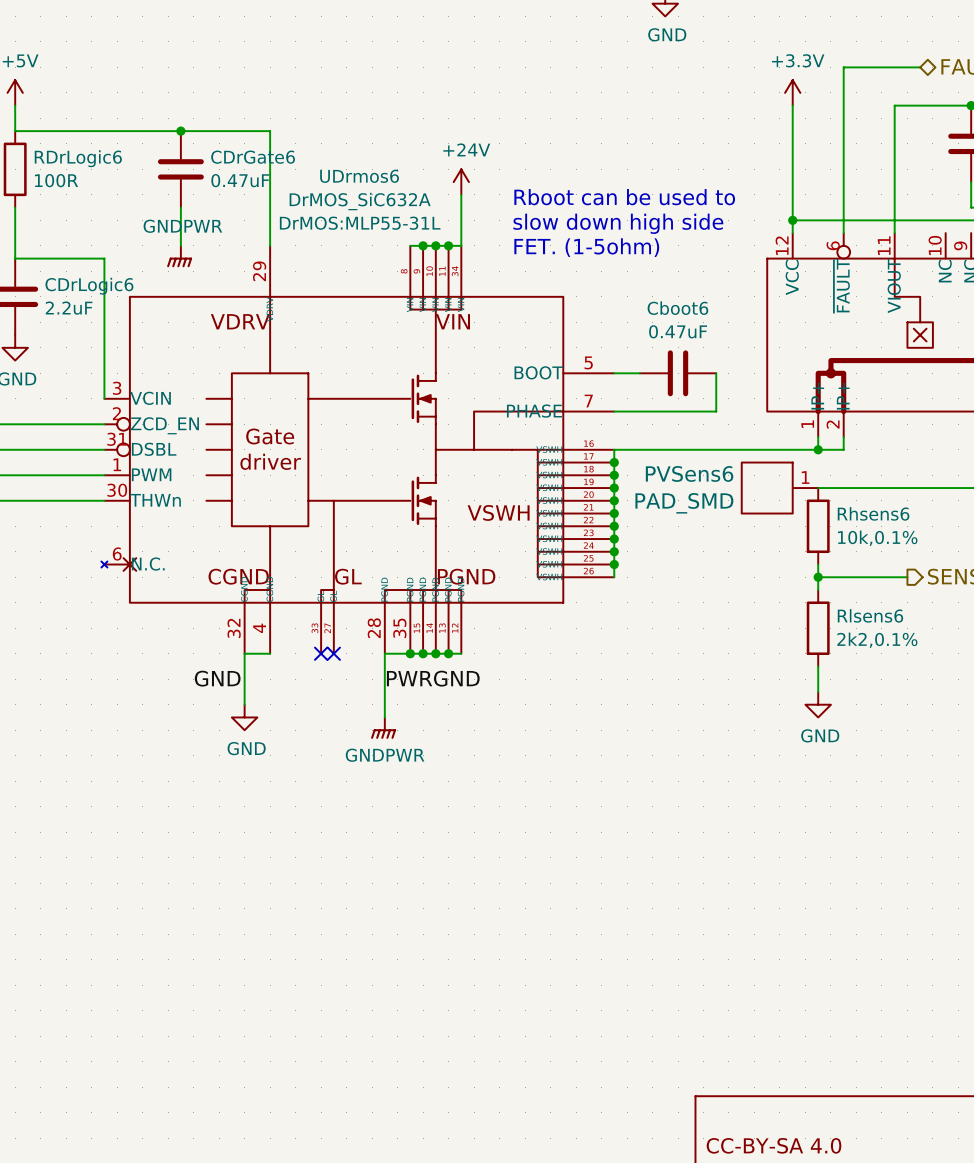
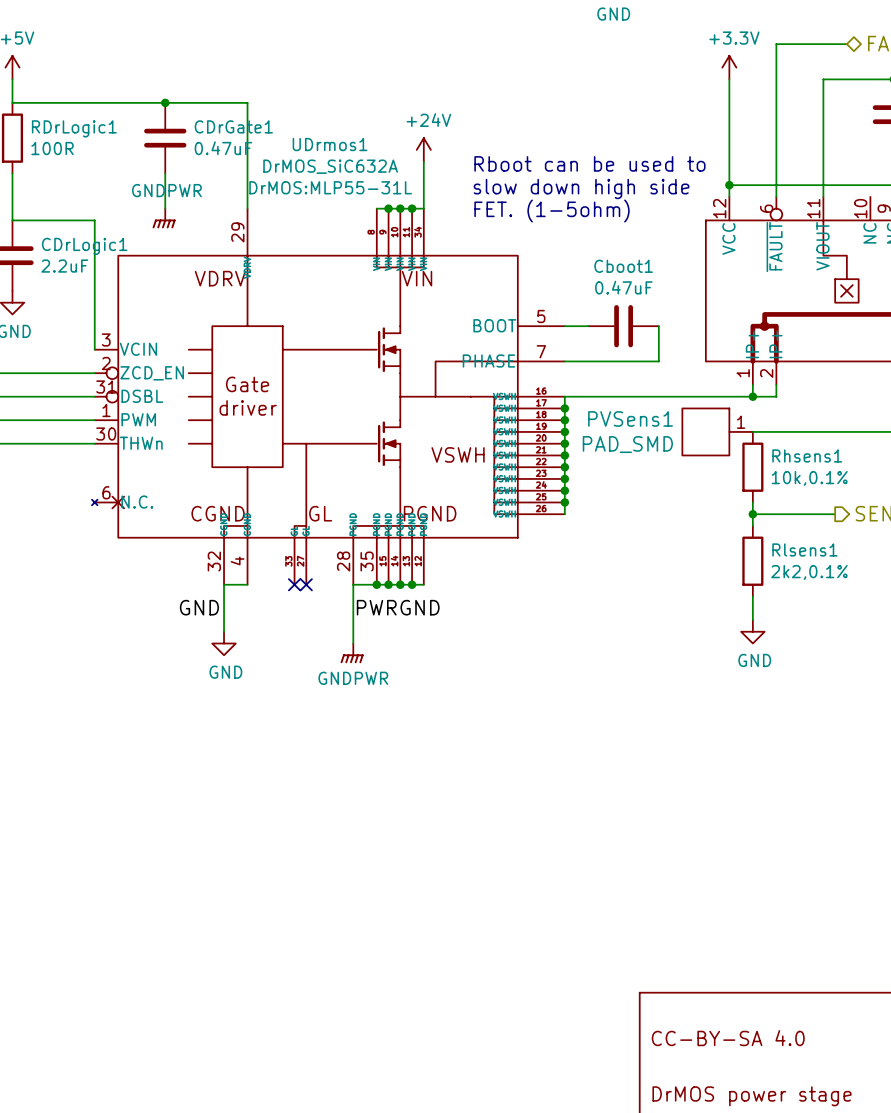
CDrGate6 name: CDrGate6 (253, 157) -> CDrGate1 (233, 126)
RDrLogic6 name: RDrLogic6 (78, 158) -> RDrLogic1 (74, 128)
UDrmos6 name: UDrmos6 (359, 176) -> UDrmos1 (330, 144)
CDrLogic6 name: CDrLogic6 (89, 286) -> CDrLogic1 (84, 246)
Cboot6 name: Cboot6 (677, 308) -> Cboot1 (623, 266)
PVSens6 name: PVSens6 (689, 473) -> PVSens1 (630, 418)
Rhsens6 name: Rhsens6 (873, 513) -> Rhsens1 (807, 455)
Rlsens6 name: Rlsens6 (870, 615) -> Rlsens1 (804, 549)

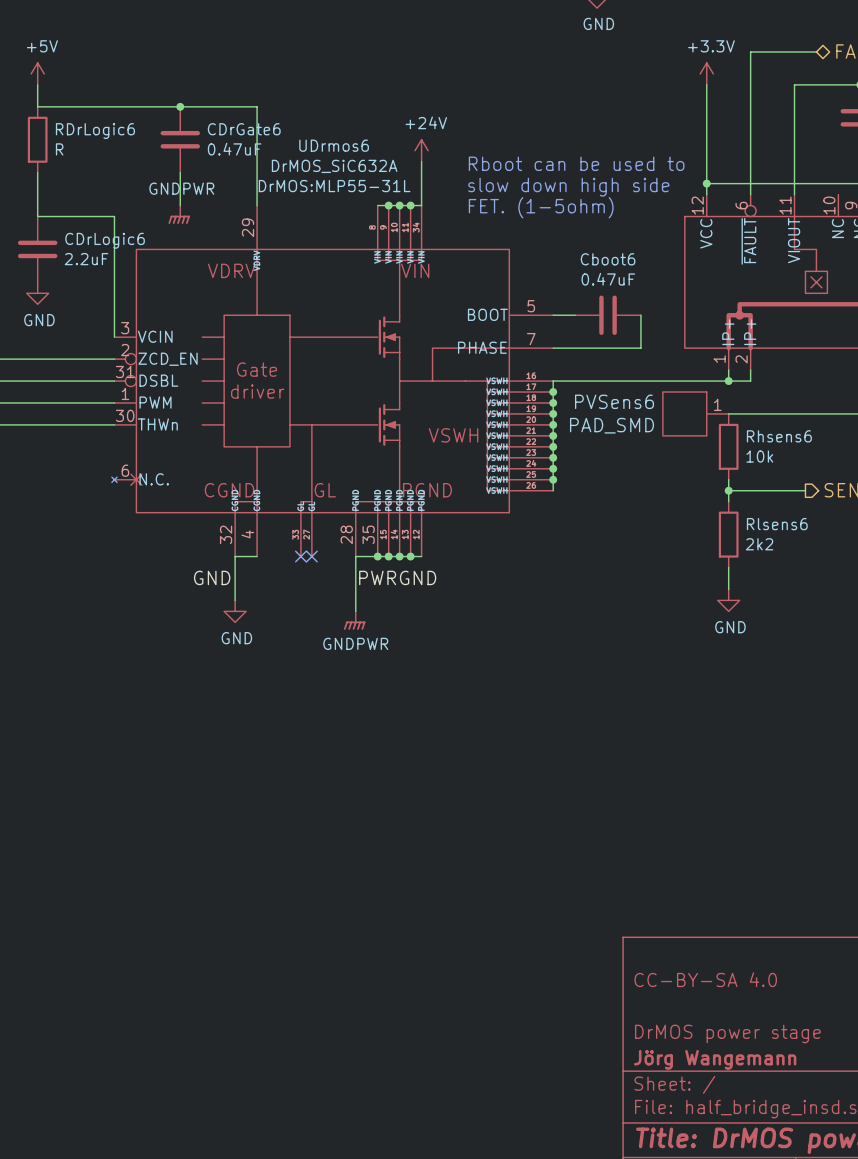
CDrGate1 name: CDrGate1 (233, 126) -> CDrGate6 (244, 129)
RDrLogic1 name: RDrLogic1 (74, 128) -> RDrLogic6 (95, 131)
UDrmos1 name: UDrmos1 (330, 144) -> UDrmos6 (334, 145)
RDrLogic1 value: 100R (52, 148) -> R (59, 149)
CDrLogic1 name: CDrLogic1 (84, 246) -> CDrLogic6 (105, 240)
Cboot1 name: Cboot1 (623, 266) -> Cboot6 (608, 259)
PVSens1 name: PVSens1 (630, 418) -> PVSens6 (614, 401)
Rhsens1 name: Rhsens1 (807, 455) -> Rhsens6 (779, 436)
Rhsens1 value: 10k,0.1% (809, 478) -> 10k (759, 456)
Rlsens1 name: Rlsens1 (804, 549) -> Rlsens6 (777, 524)
Rlsens1 value: 2k2,0.1% (809, 572) -> 2k2 (759, 544)

